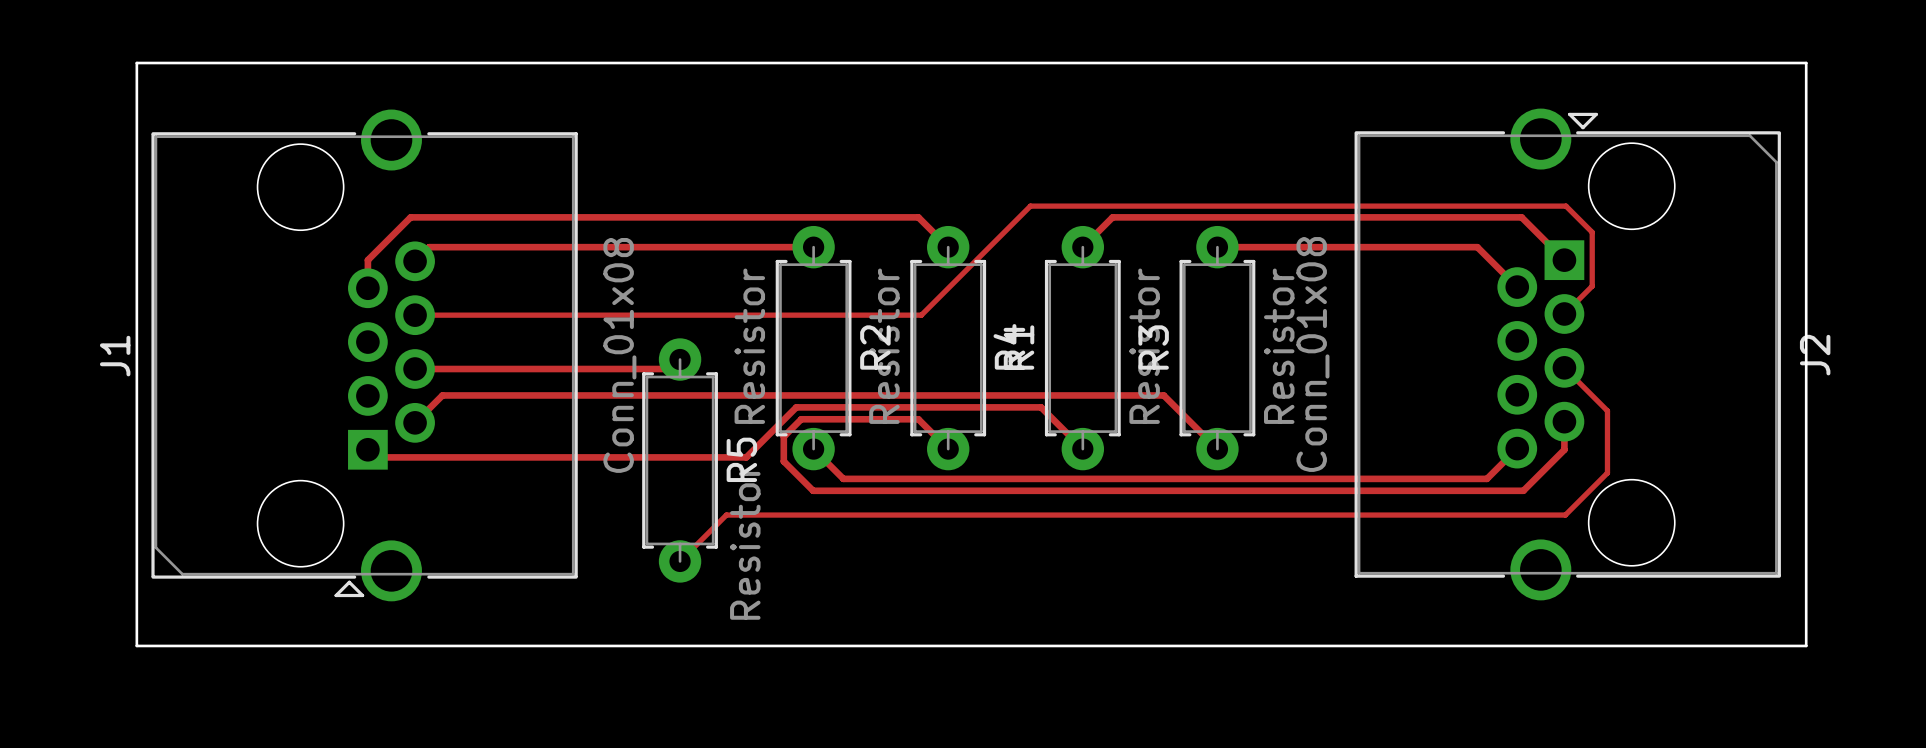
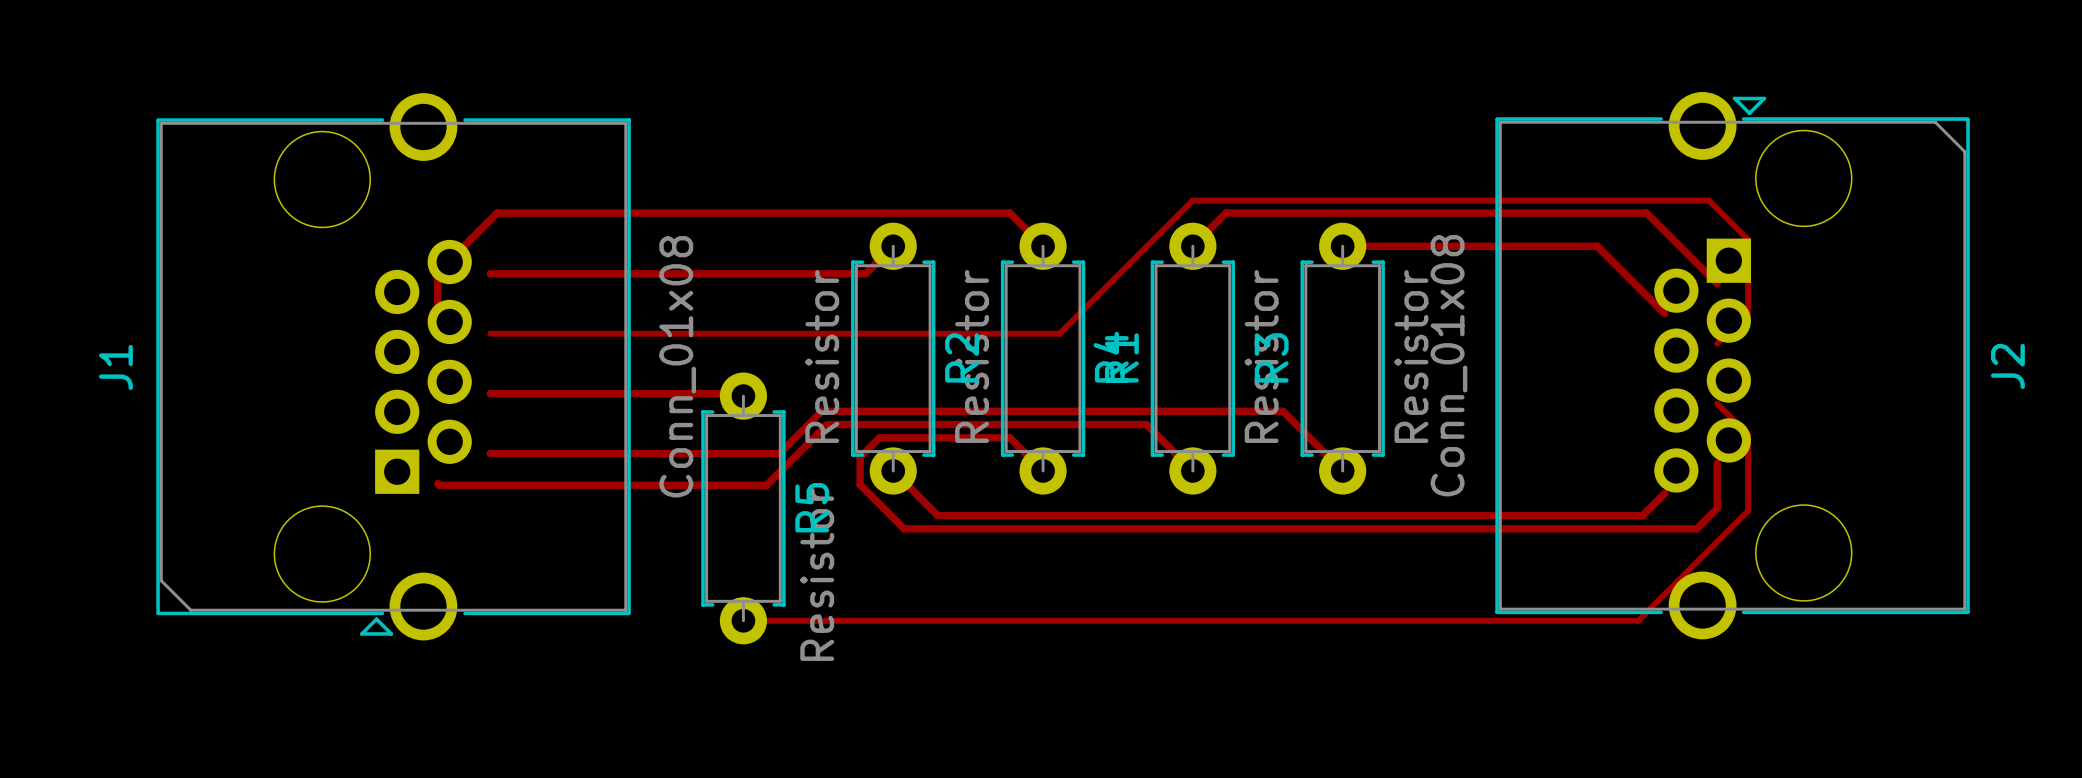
board edge: (136, 63) (1806, 63) (1806, 645) (136, 645) (136, 63) -> none
track: (1082, 206) (1030, 206) (921, 315) (415, 315) -> (1192, 200) (1059, 333) (490, 333)
track: (1546, 206) (1566, 206) (1592, 232) (1592, 286) (1564, 313) -> (1708, 200) (1748, 239) (1748, 312) (1717, 343)
track: (457, 217) (410, 217) (367, 260) (367, 288) -> (497, 213) (437, 272) (437, 303)
track: (1490, 217) (1521, 217) (1564, 260) -> (1646, 213) (1717, 283)
track: (813, 247) (429, 247) (415, 261) -> (893, 246) (865, 273) (490, 273)
track: (1446, 247) (1477, 247) (1517, 287) -> (1597, 246) (1664, 313)
track: (680, 359) (670, 369) (415, 369) -> none
track: (1564, 367) (1607, 410) (1607, 473) (1565, 515) (726, 515) (680, 561) -> none
track: none -> (490, 393) (741, 393) (743, 396)
track: none -> (1717, 403) (1748, 434) (1748, 510) (1638, 620) (743, 620)
track: (749, 395) (442, 395) (415, 422) -> (821, 411) (779, 453) (490, 453)
track: (796, 407) (746, 457) (375, 457) (367, 449) -> (874, 424) (827, 424) (766, 485) (439, 485) (437, 483)
track: (1564, 421) (1564, 449) (1523, 490) (813, 490) -> (1717, 463) (1717, 508) (1696, 528) (904, 528) (892, 517)
track: (1517, 448) (1486, 478) (843, 478) -> (1664, 493) (1642, 515) (937, 515) (926, 504)
R5 position: (680, 460) -> (743, 508)

